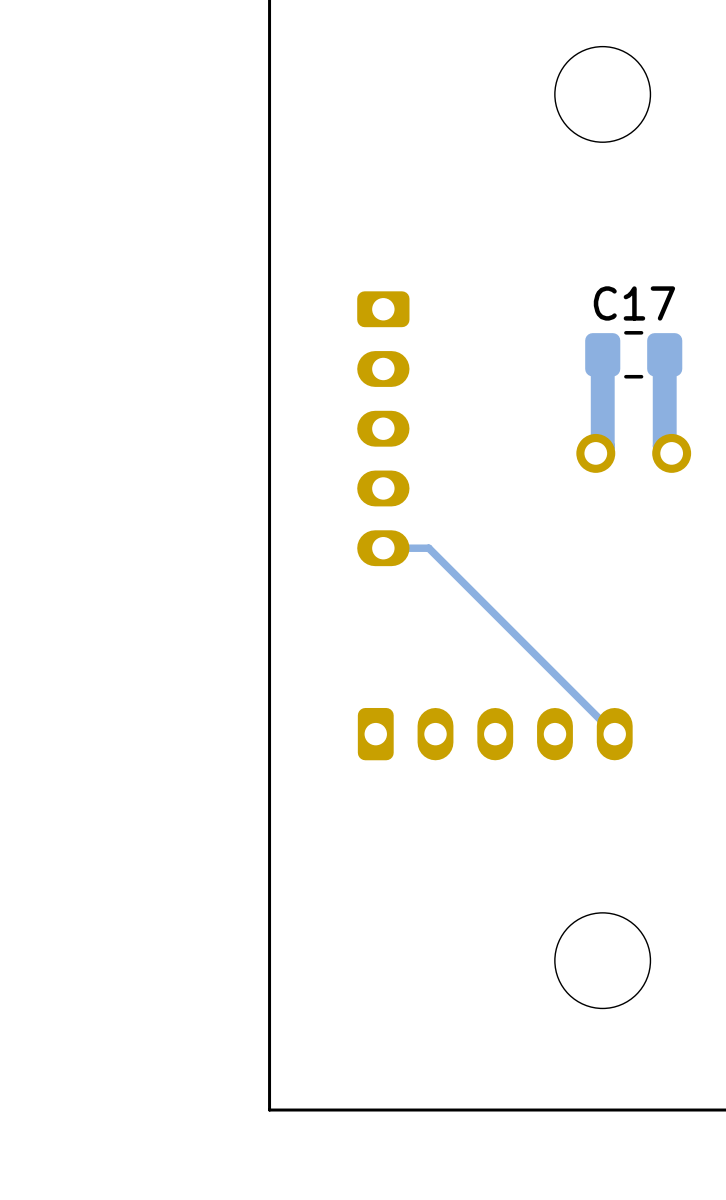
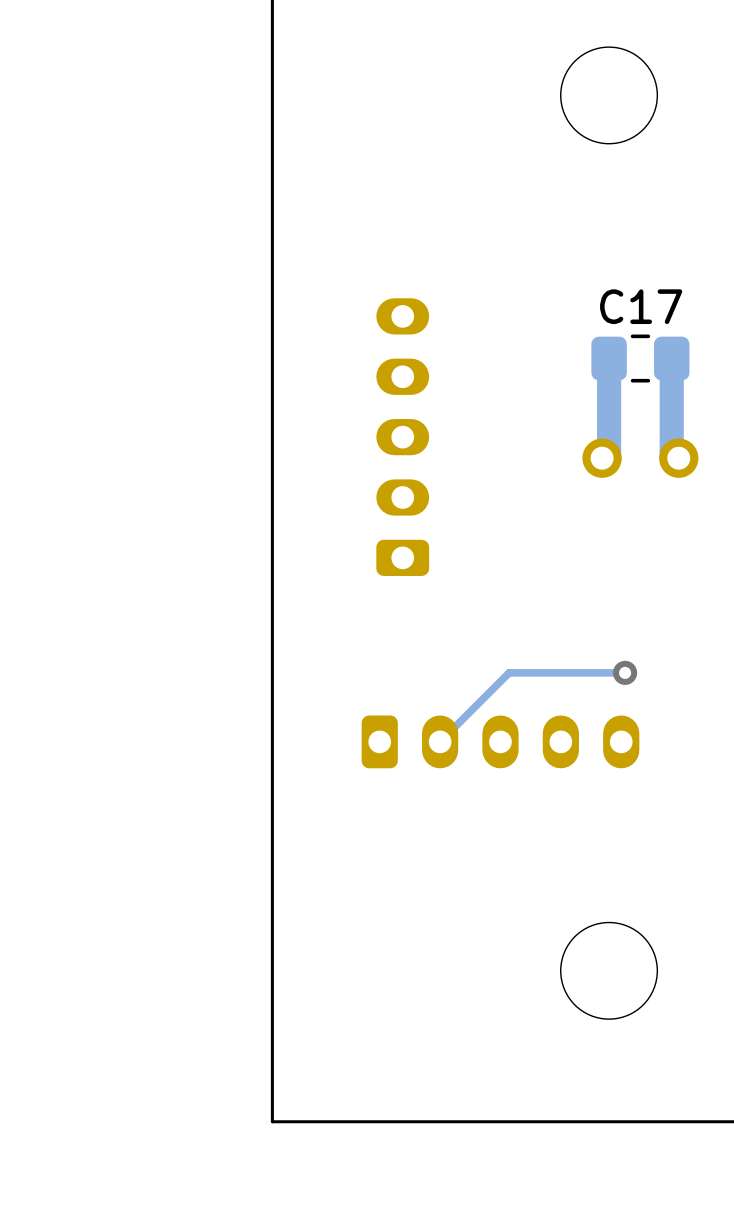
part rotation: 0° (383, 428) -> 180° (402, 437)
track: (383, 548) (428, 548) (614, 734) -> none
track: none -> (625, 672) (509, 672) (440, 741)
via: none -> (625, 672)

